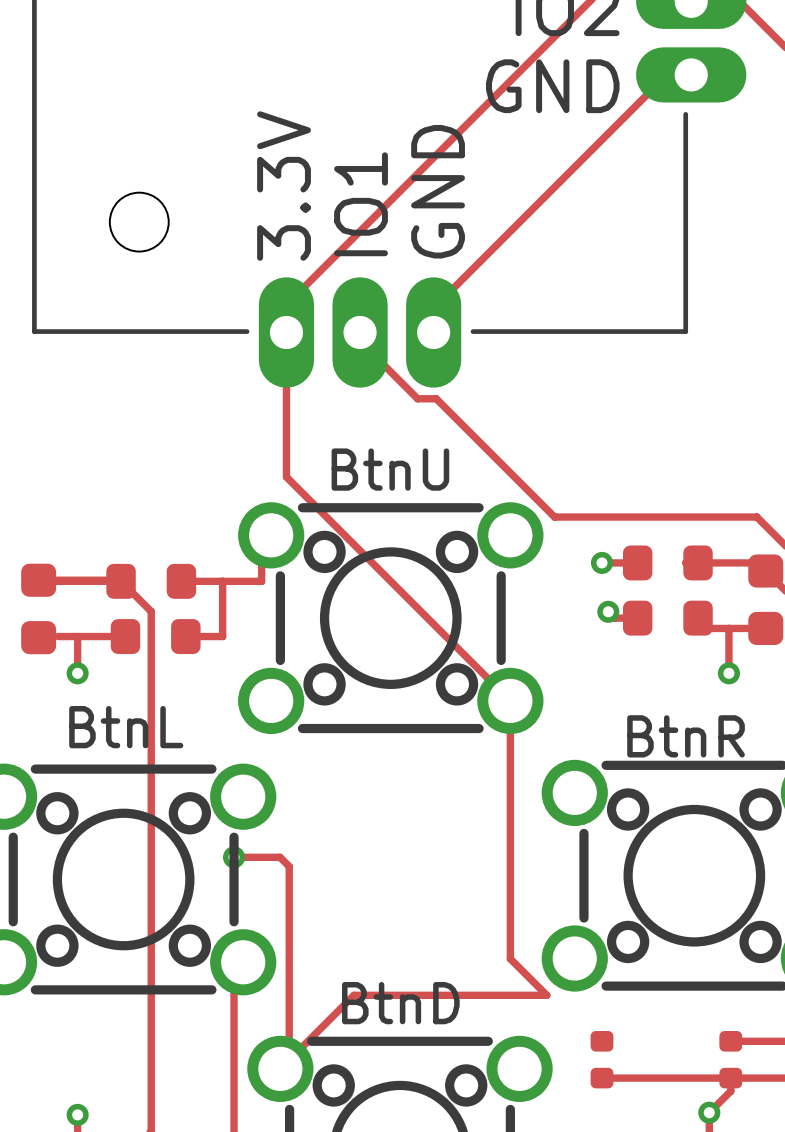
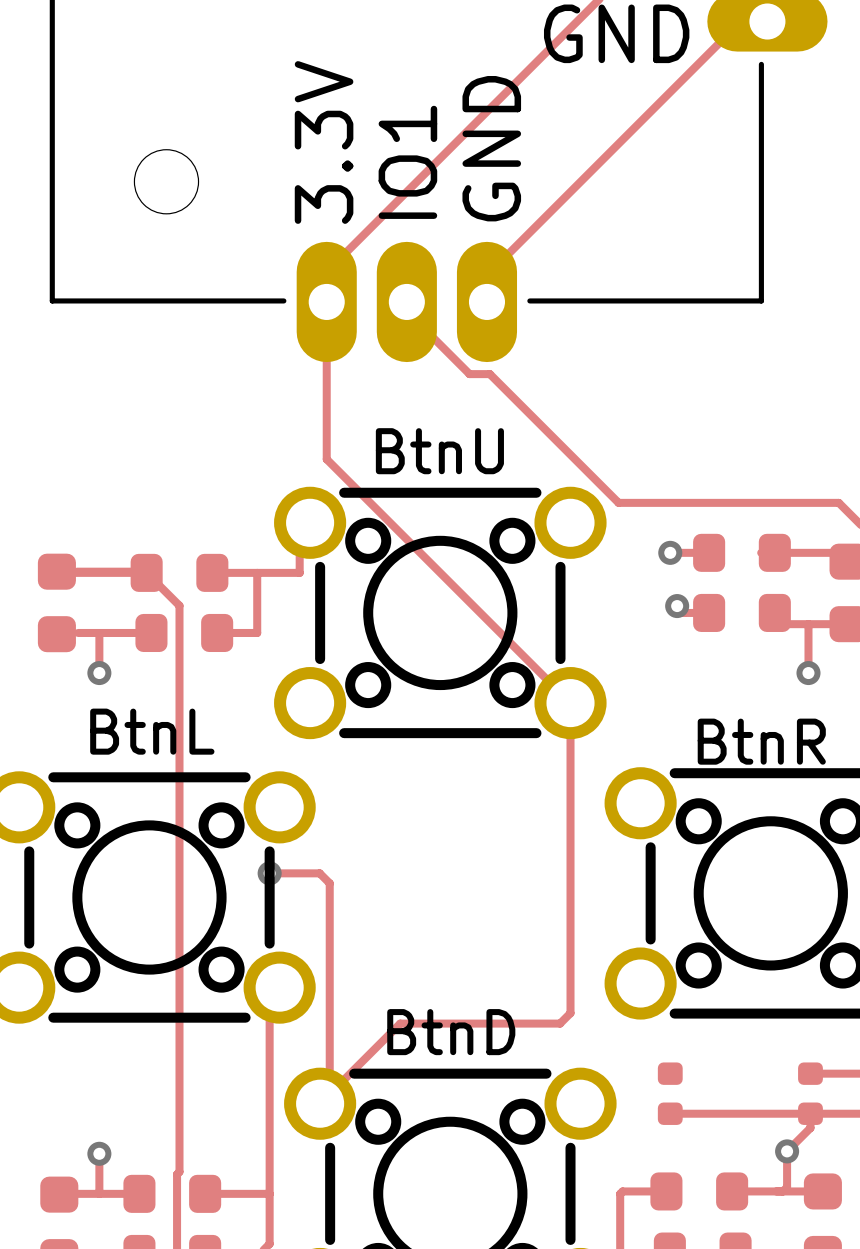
track: (510, 958) (546, 995) (500, 995) -> (570, 983) (570, 1013) (560, 1023)

